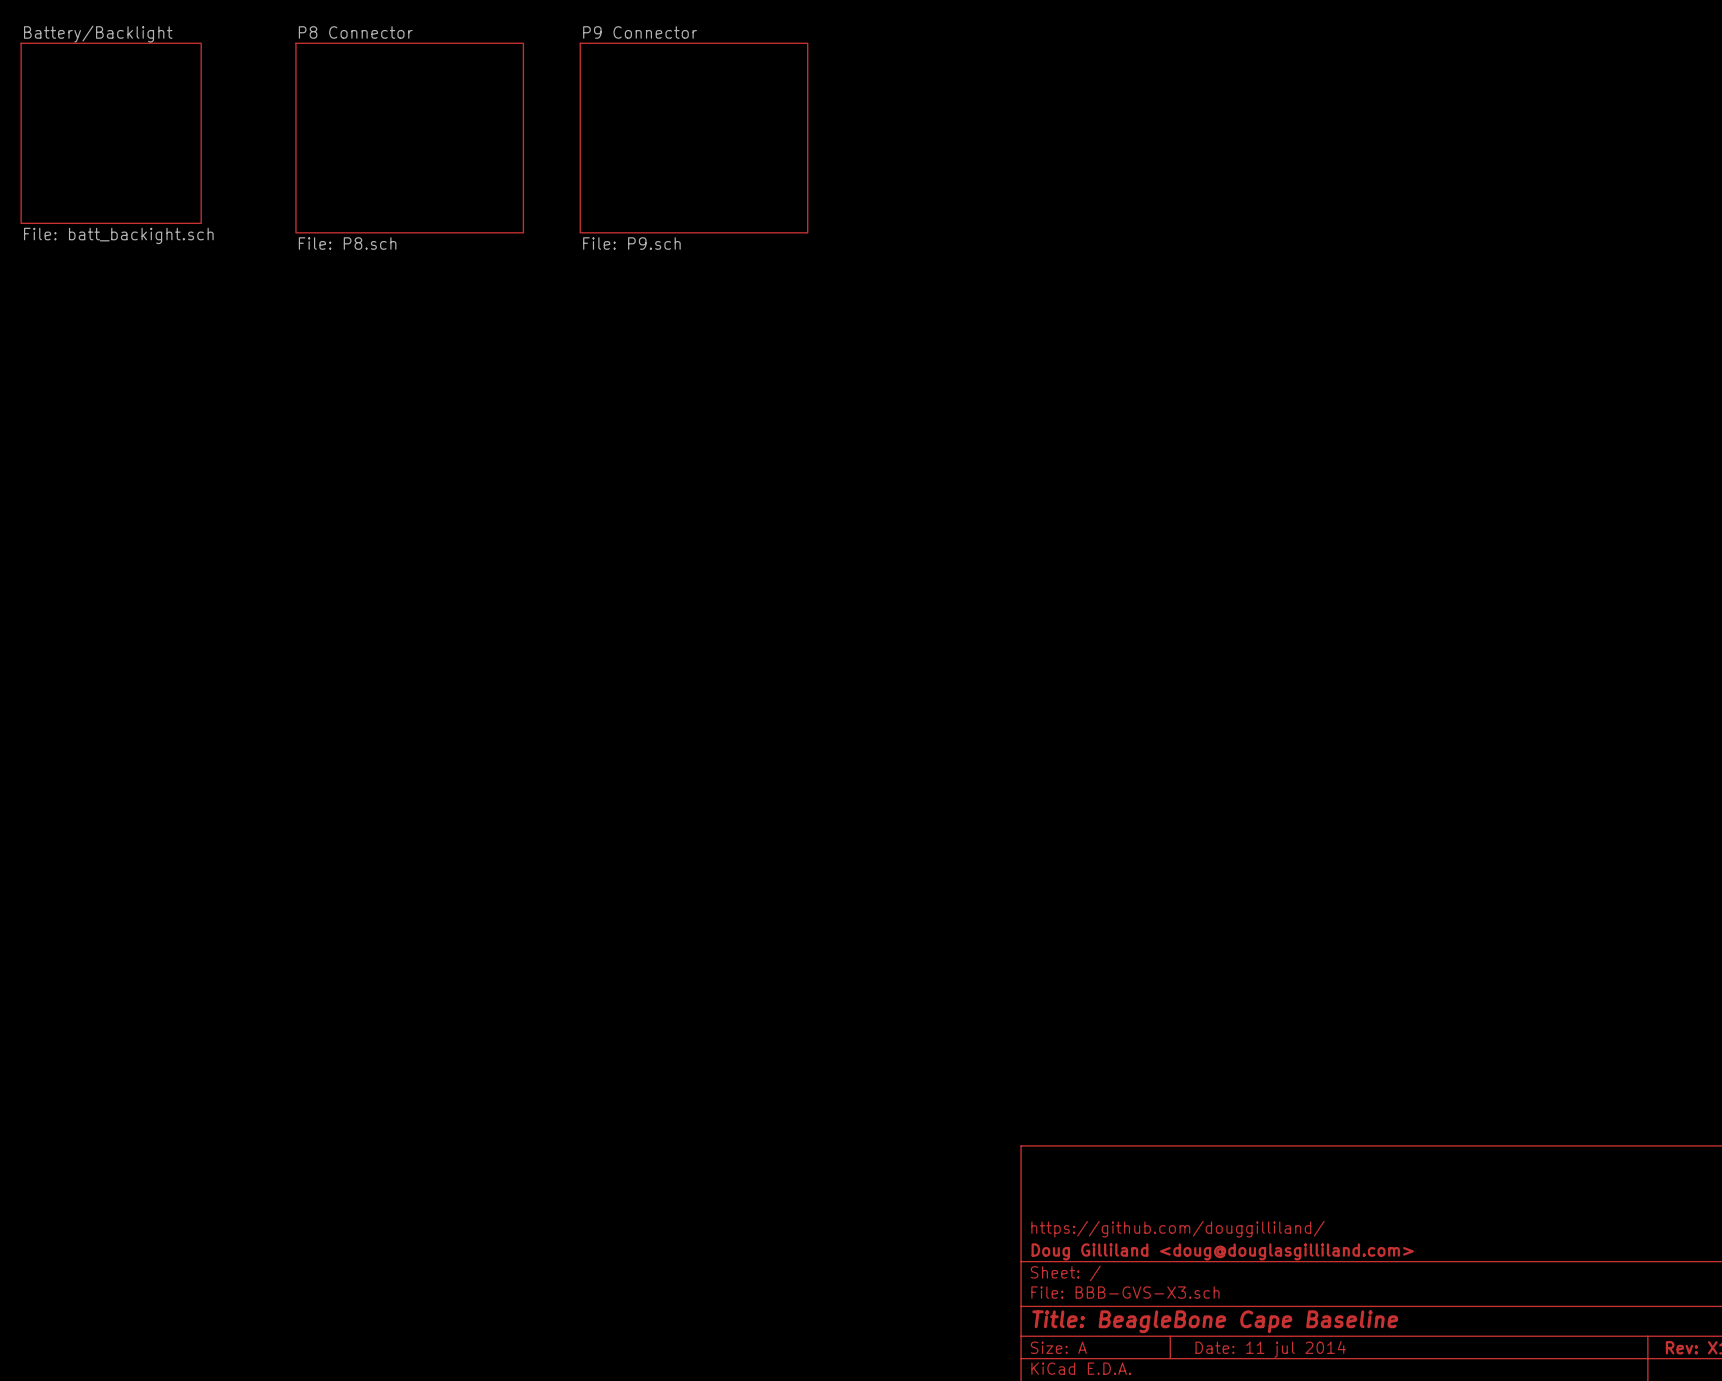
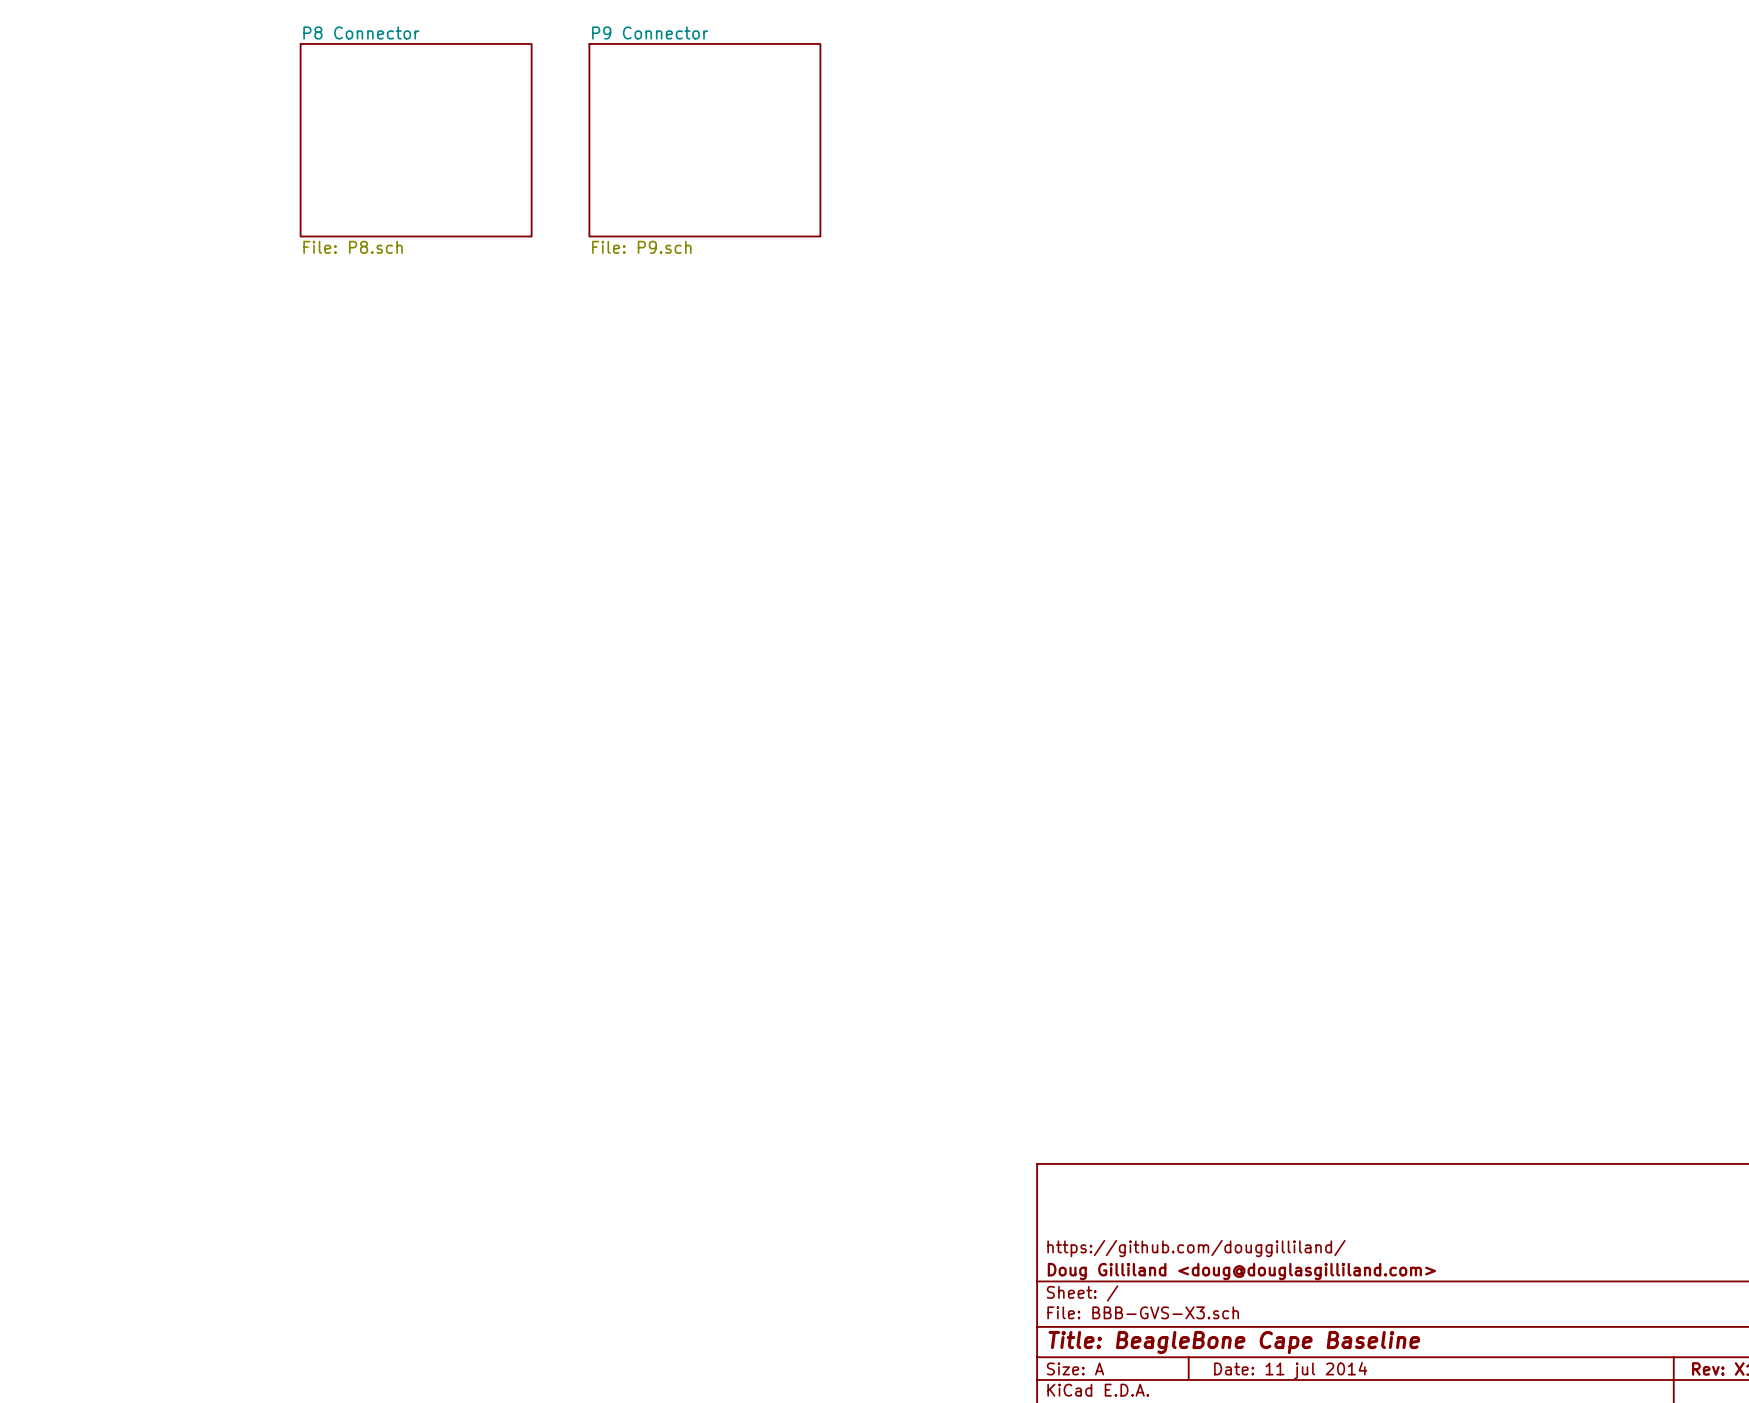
sheet Battery/Backlight: File: batt_backight.sch (111, 133) -> none

